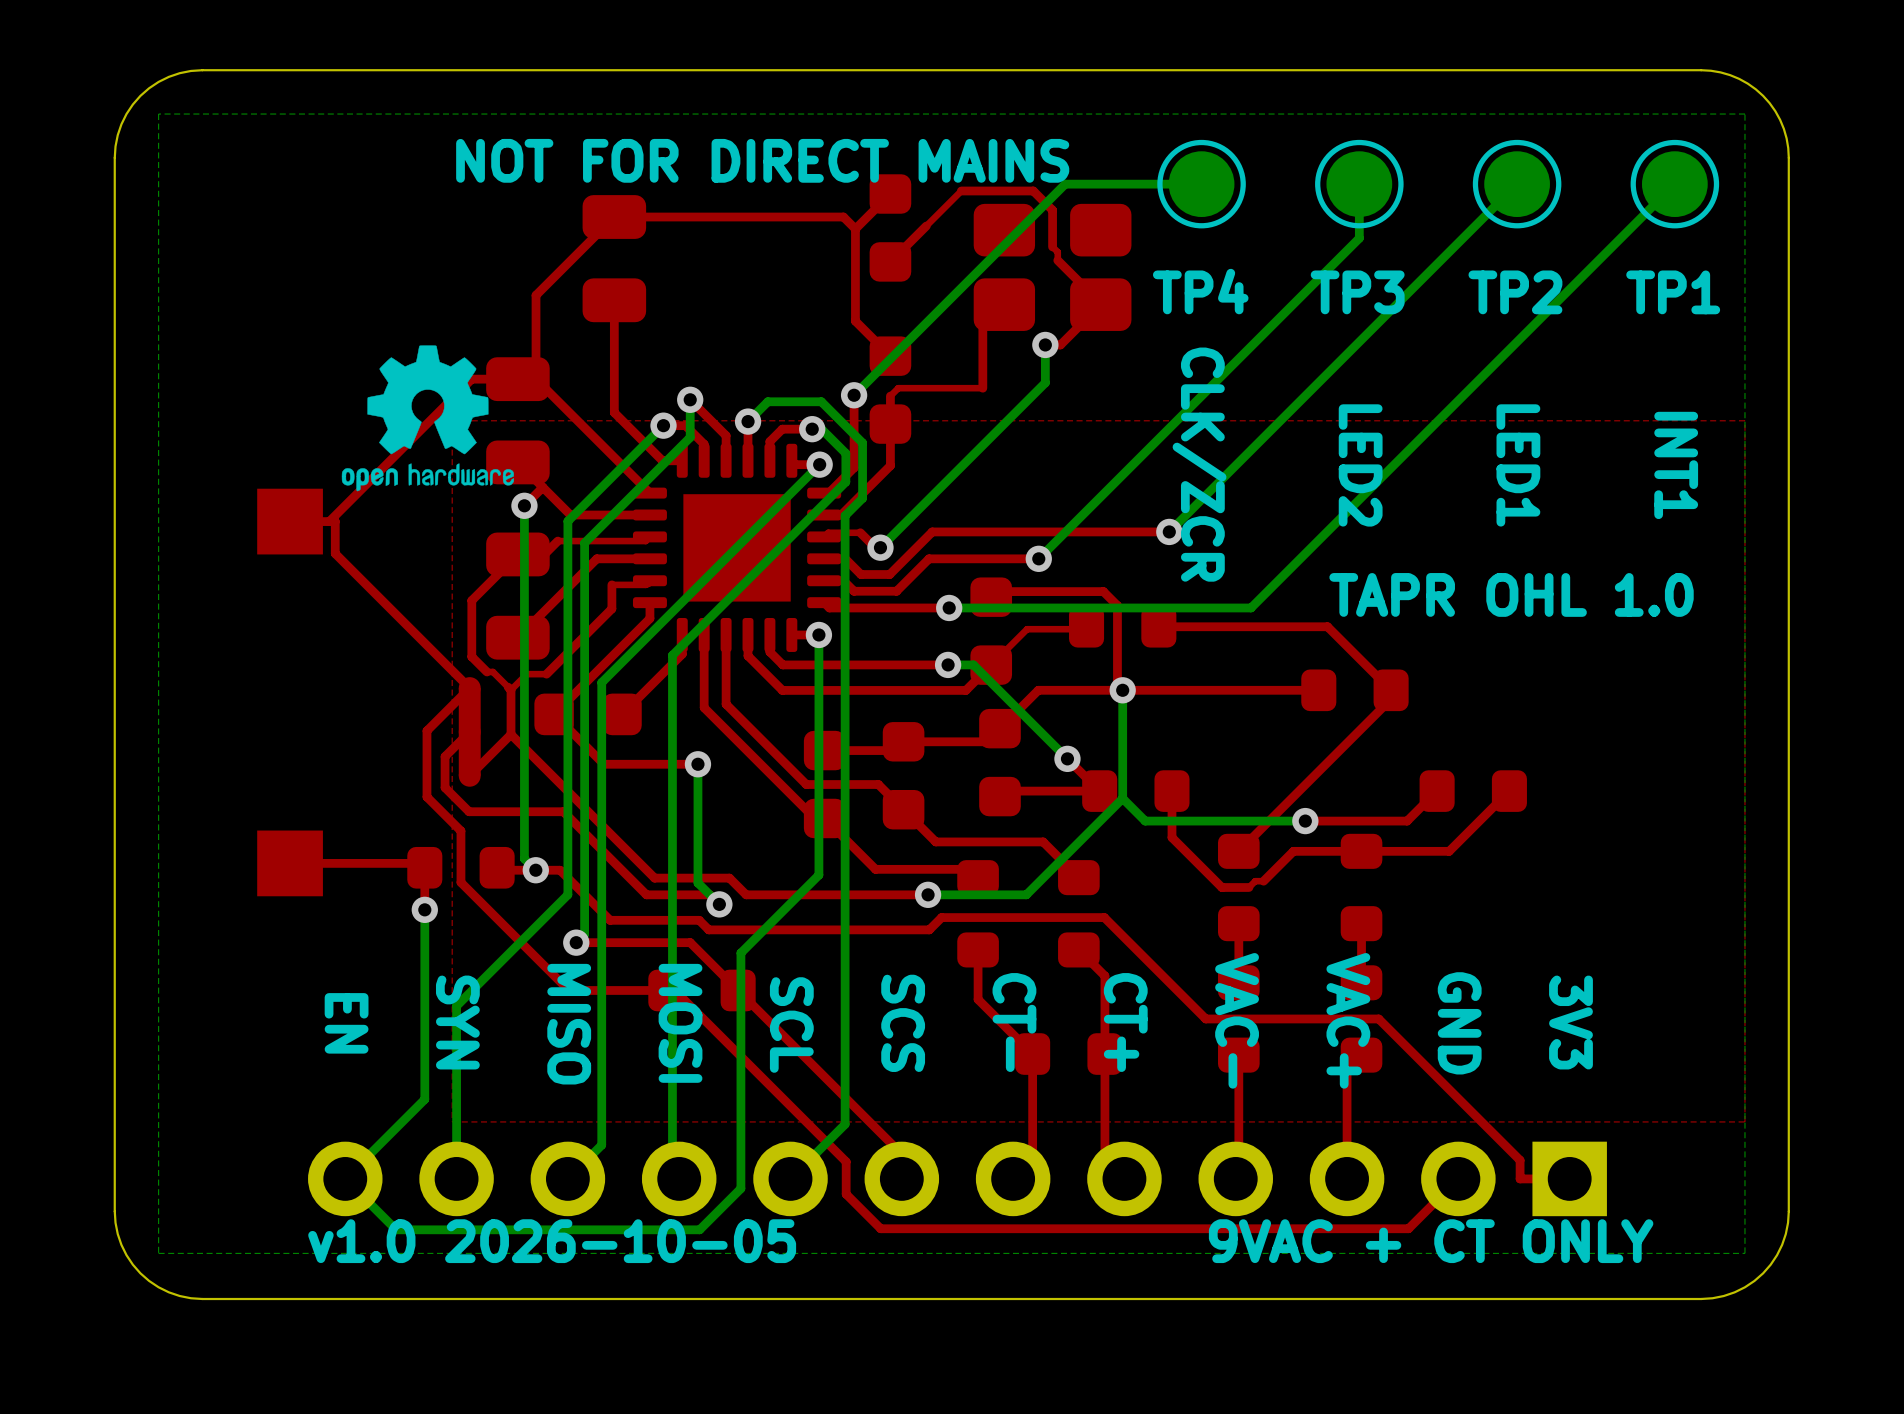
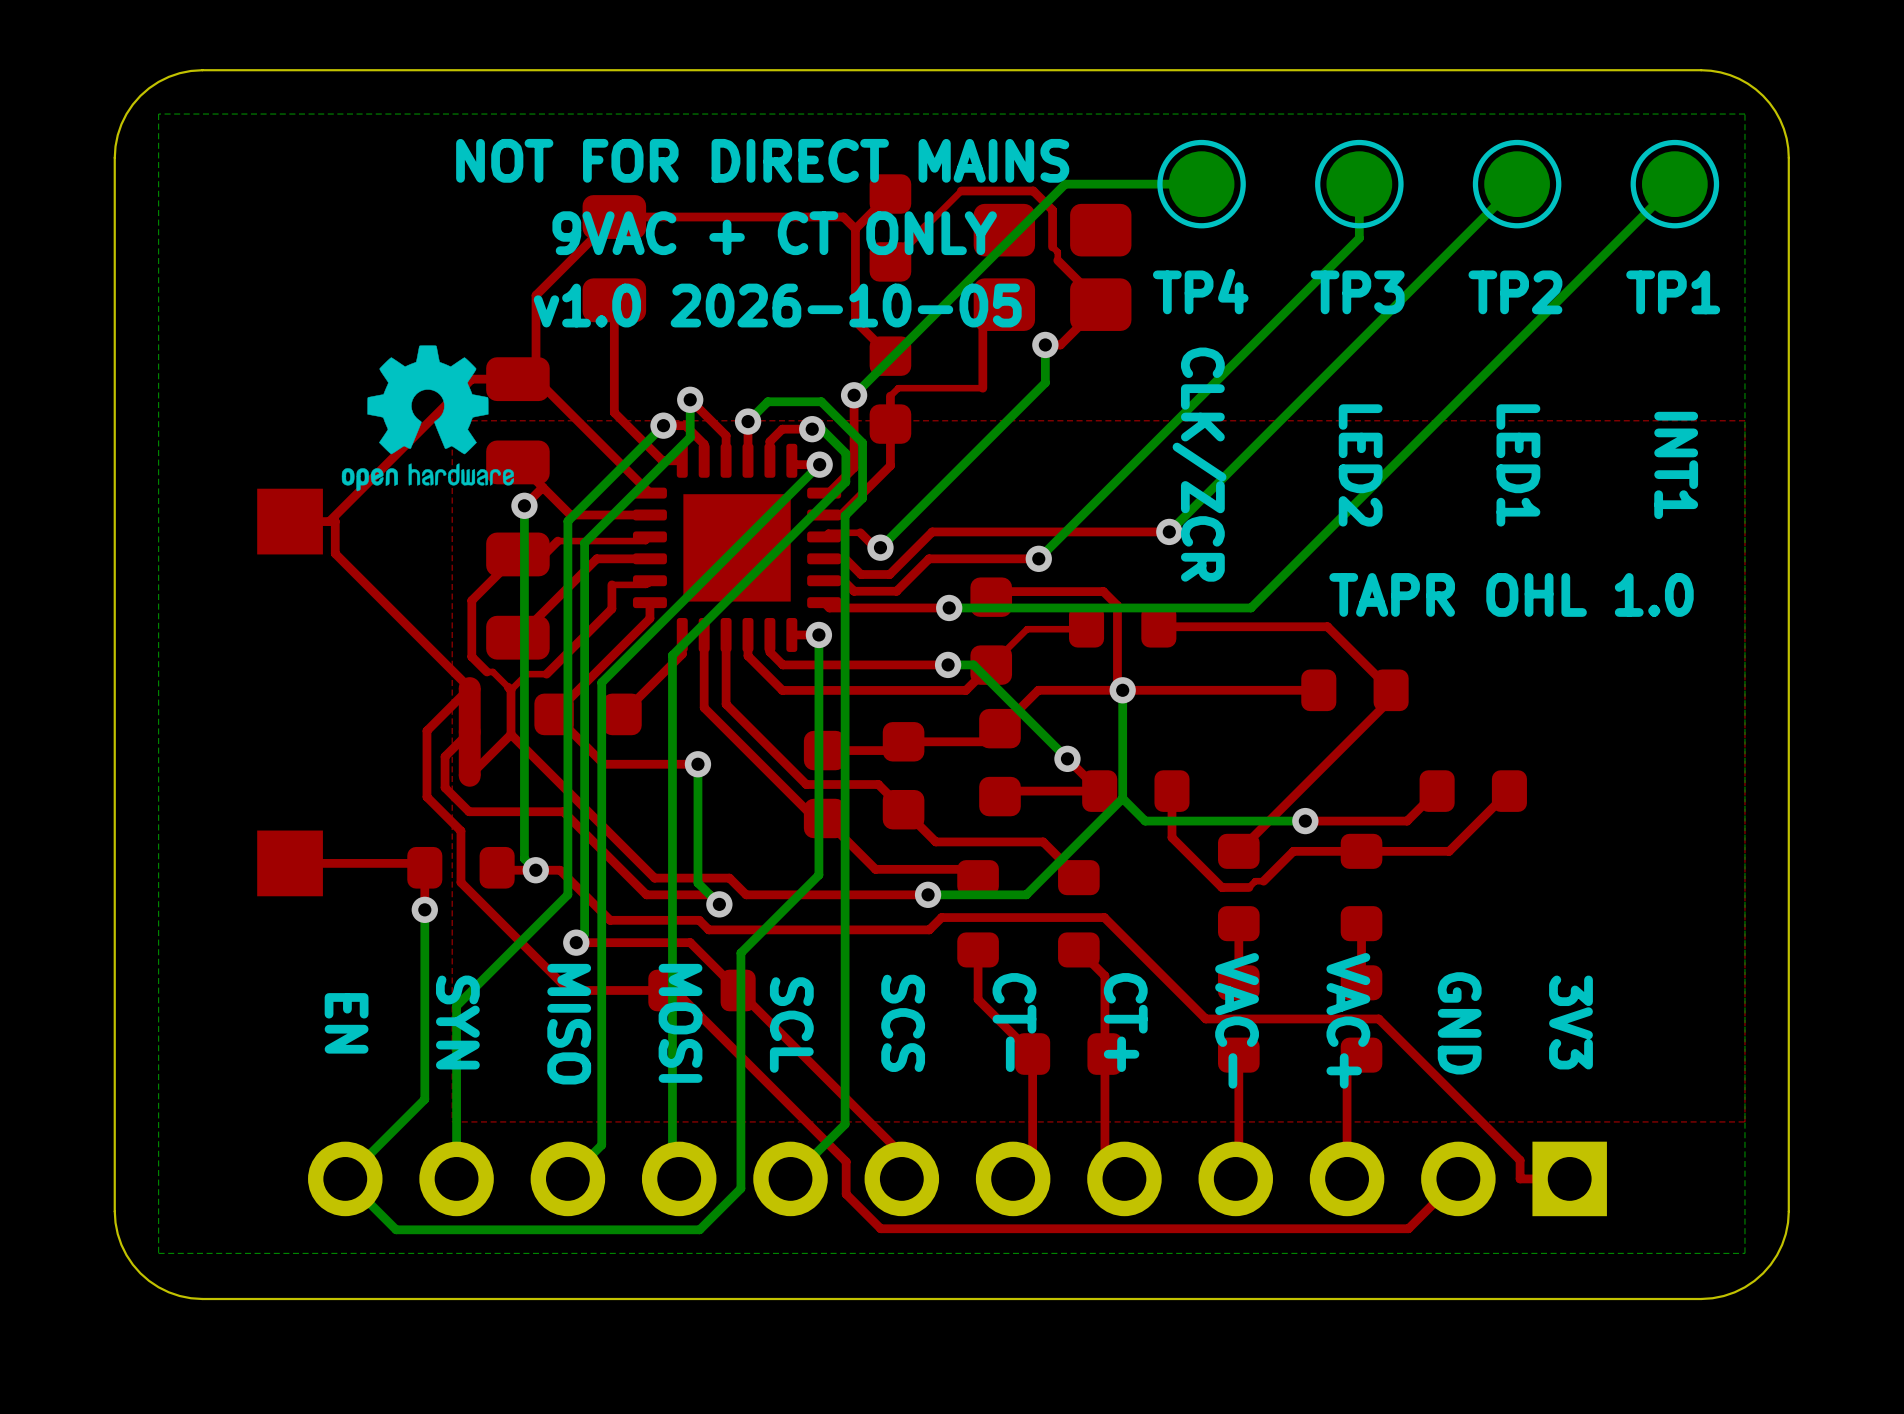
text: none -> 9VAC + CT ONLY (774, 233)
text position: v1.0 2026-10-05 (552, 1241) -> v1.0 2026-10-05 (777, 305)
text: 9VAC + CT ONLY (1431, 1241) -> none

